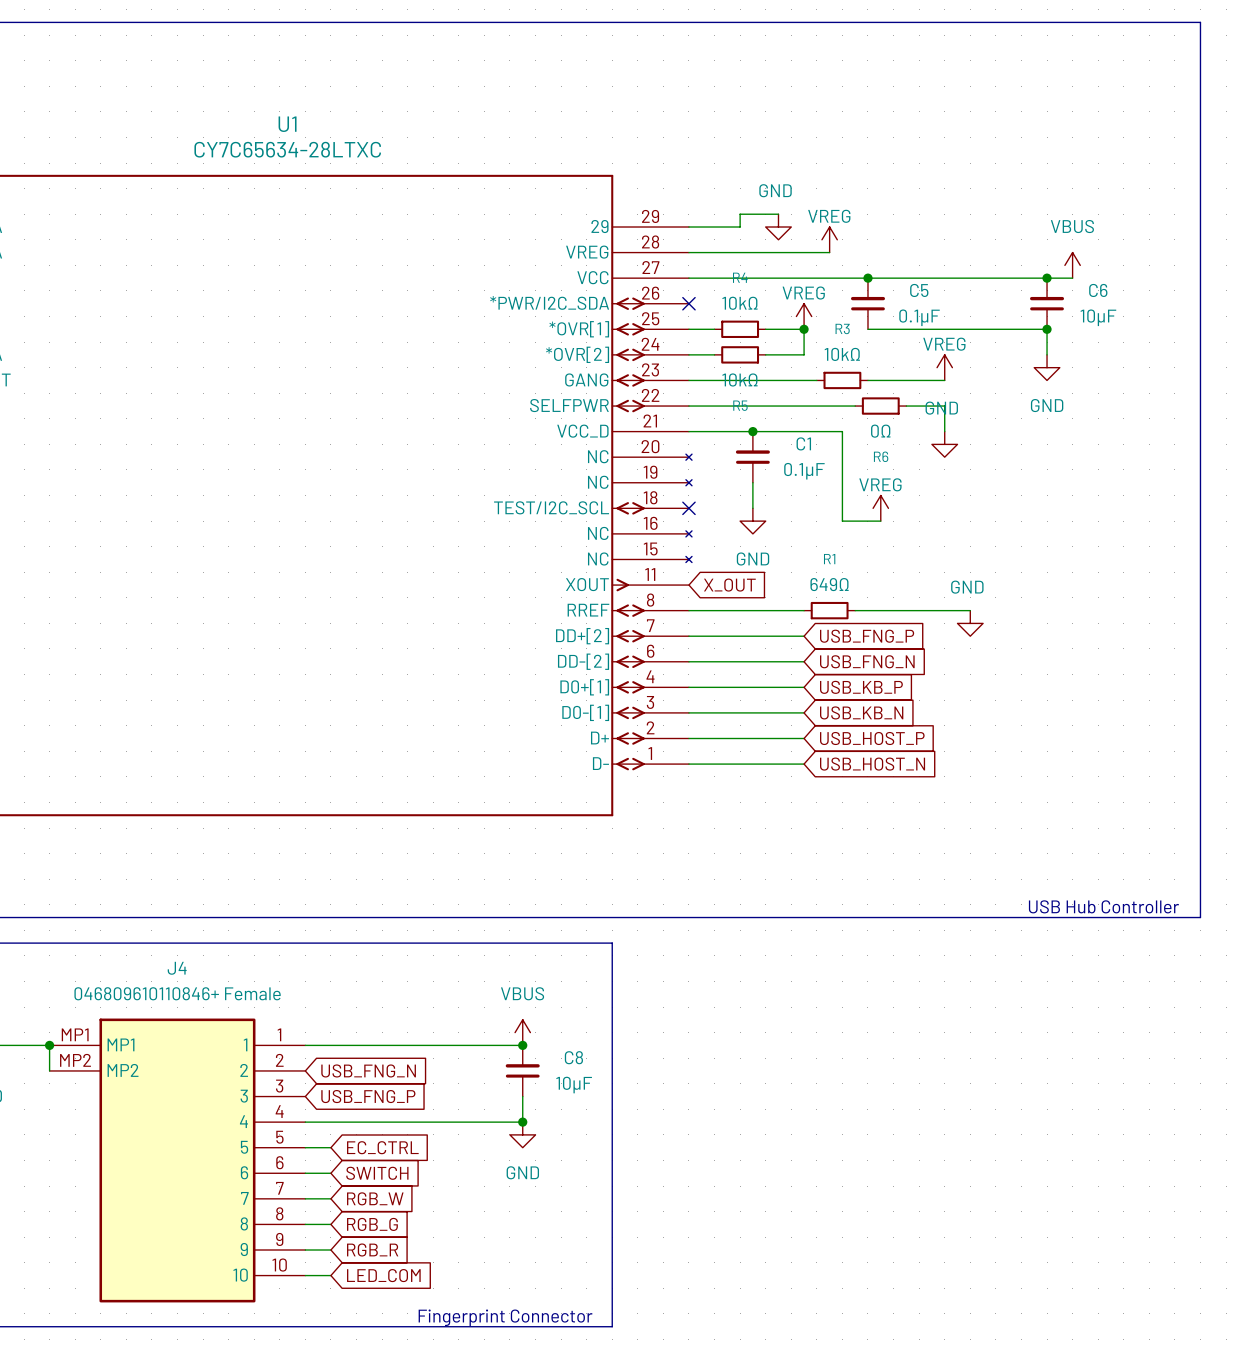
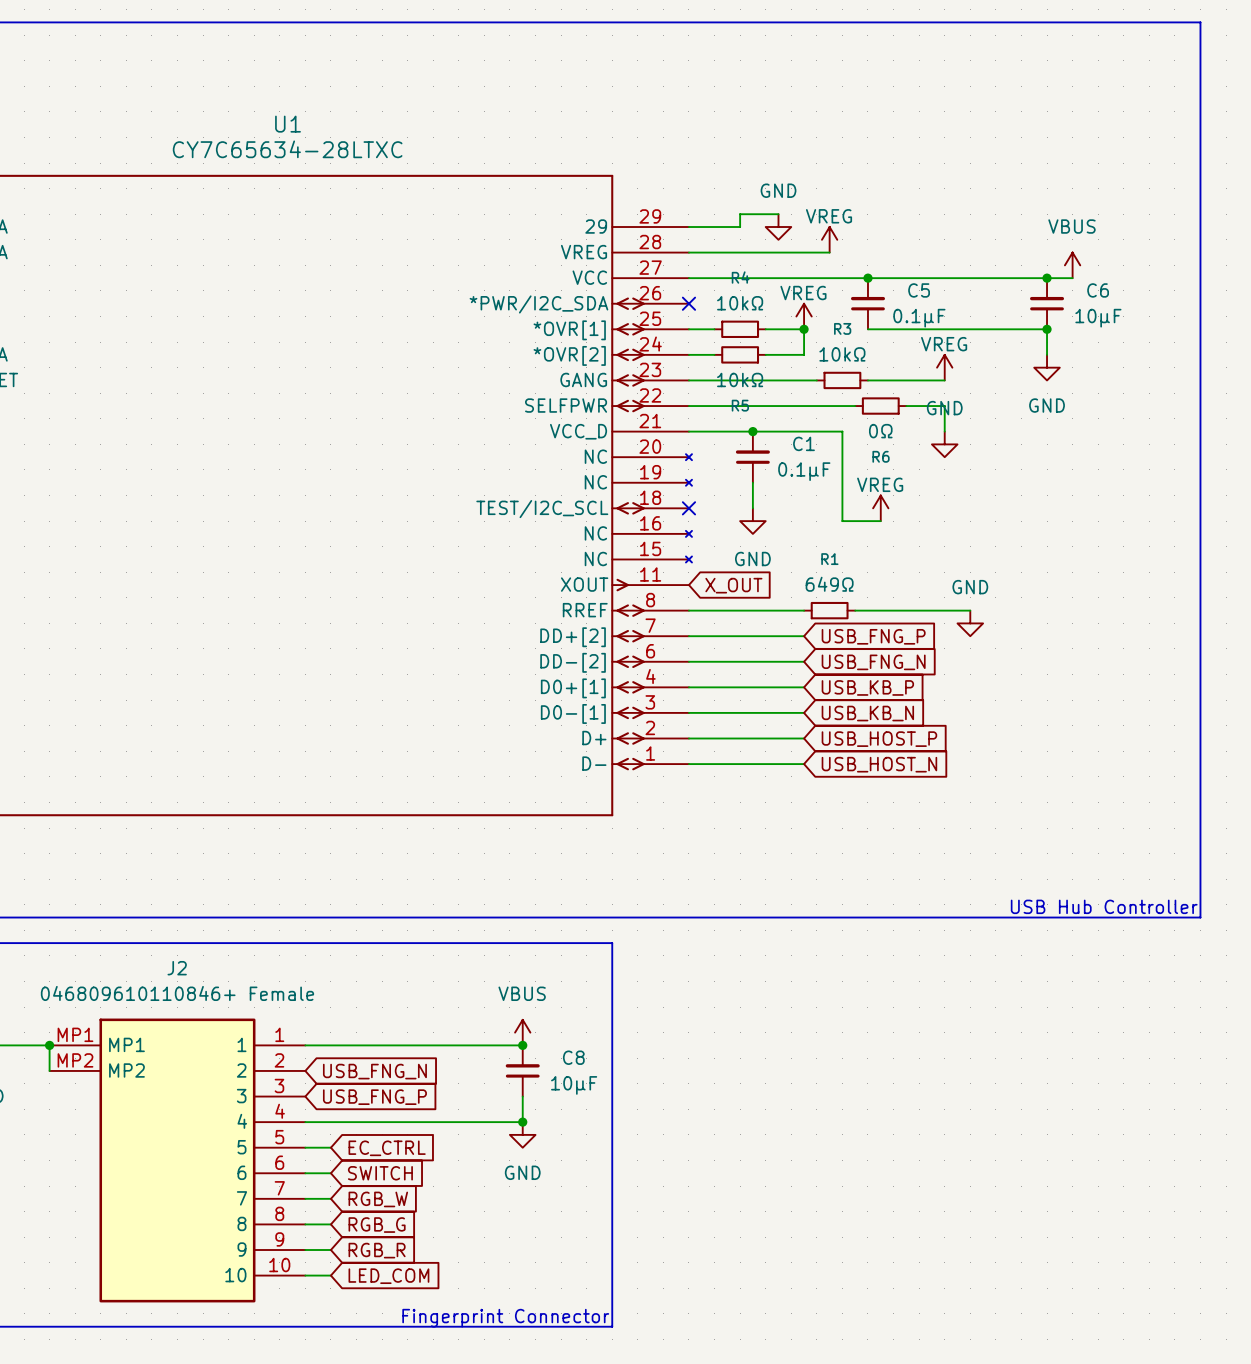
J4 name: J4 (177, 968) -> J2 (177, 968)

